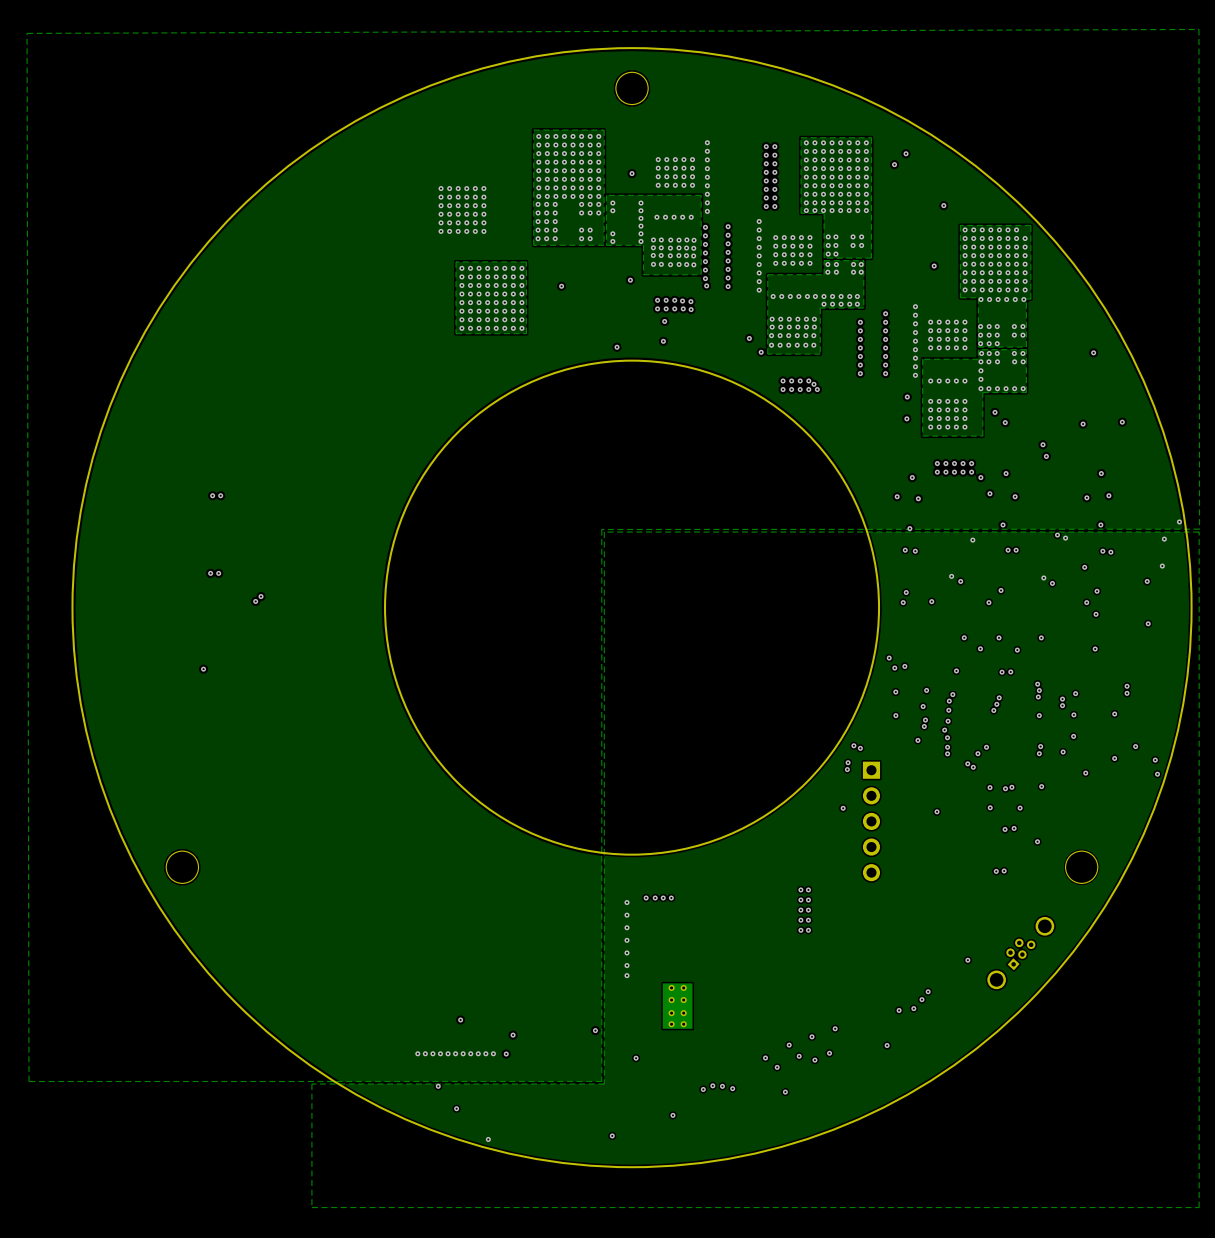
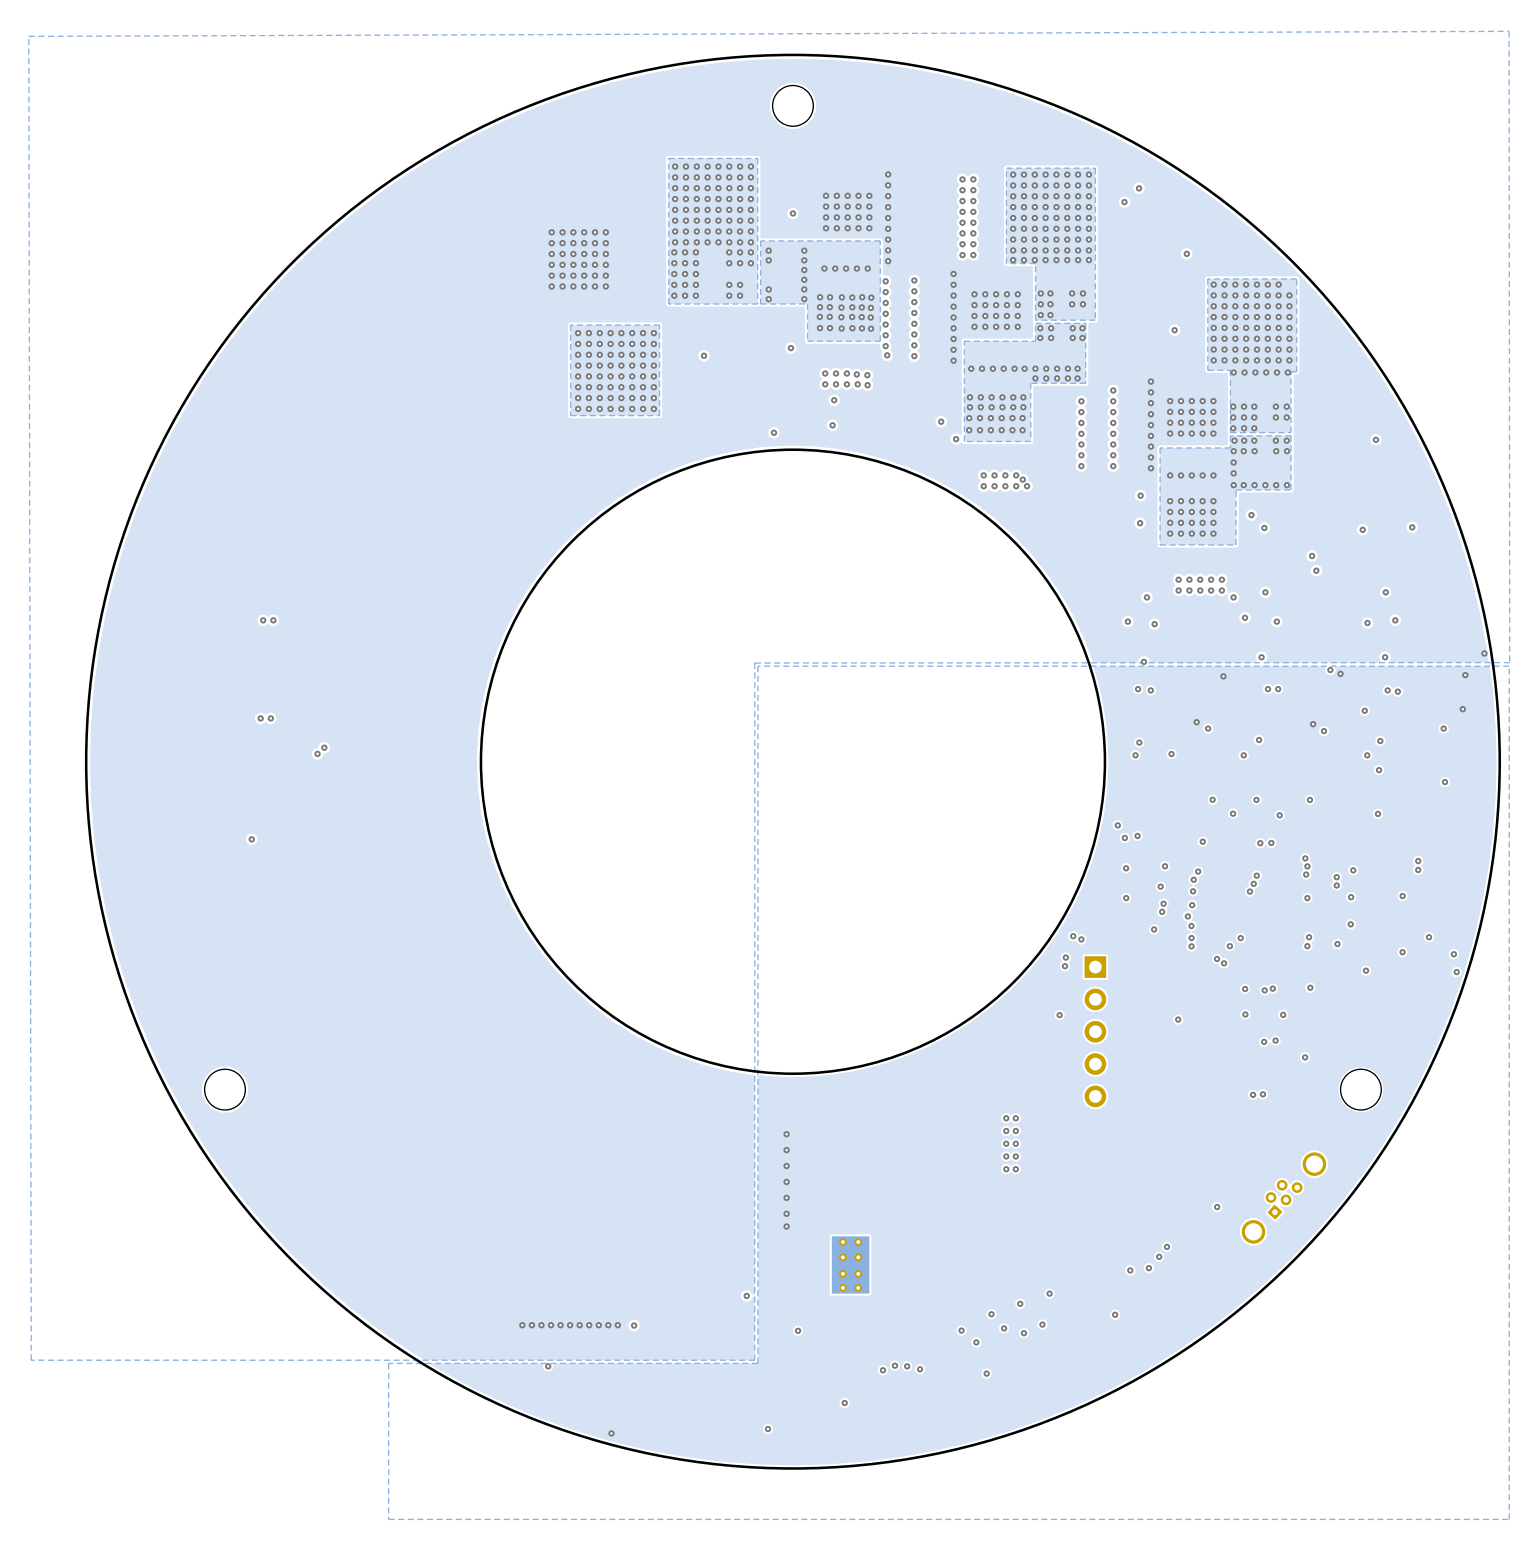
via: (646, 898) -> none
via: (655, 898) -> none
via: (663, 898) -> none
via: (671, 898) -> none
via: (460, 1020) -> none
via: (513, 1035) -> none
via: (456, 1108) -> none

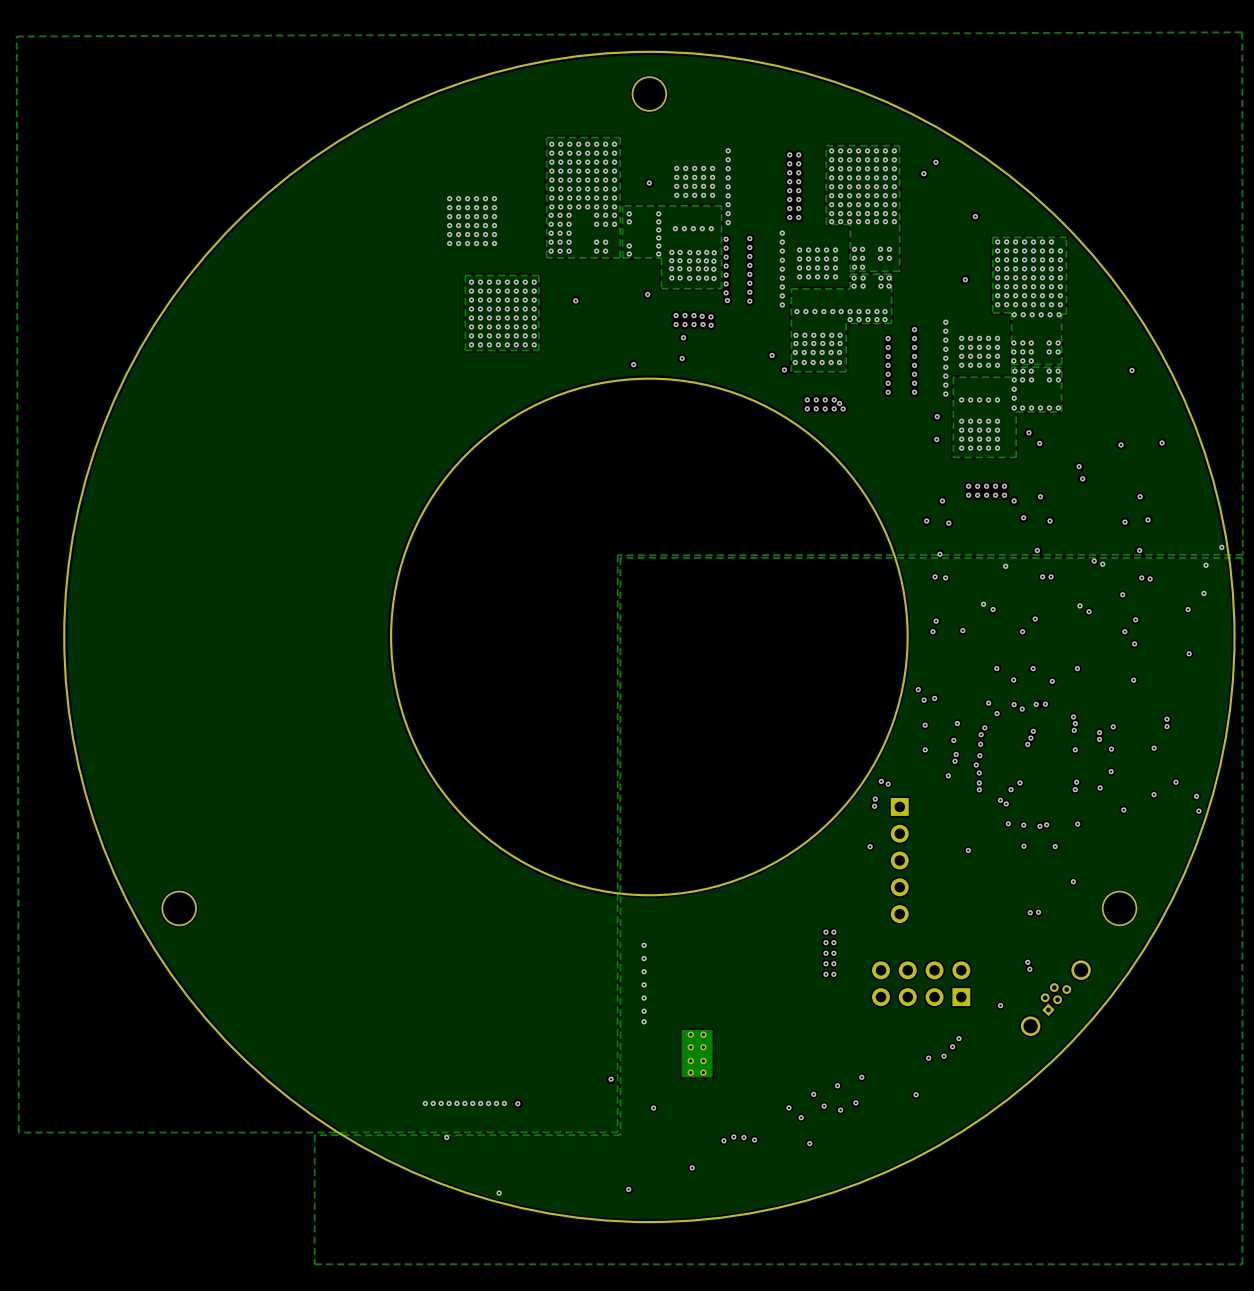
via: (263, 620) -> none
via: (273, 620) -> none
via: (260, 718) -> none
via: (270, 718) -> none
via: (324, 747) -> none
via: (317, 753) -> none
via: (251, 839) -> none
via: none -> (1014, 704)
via: none -> (1022, 709)
via: none -> (997, 713)
via: none -> (1008, 823)
via: (1275, 1040) -> none
via: (1264, 1041) -> none
via: none -> (1027, 962)
via: none -> (1029, 969)
part: none -> (921, 983)

